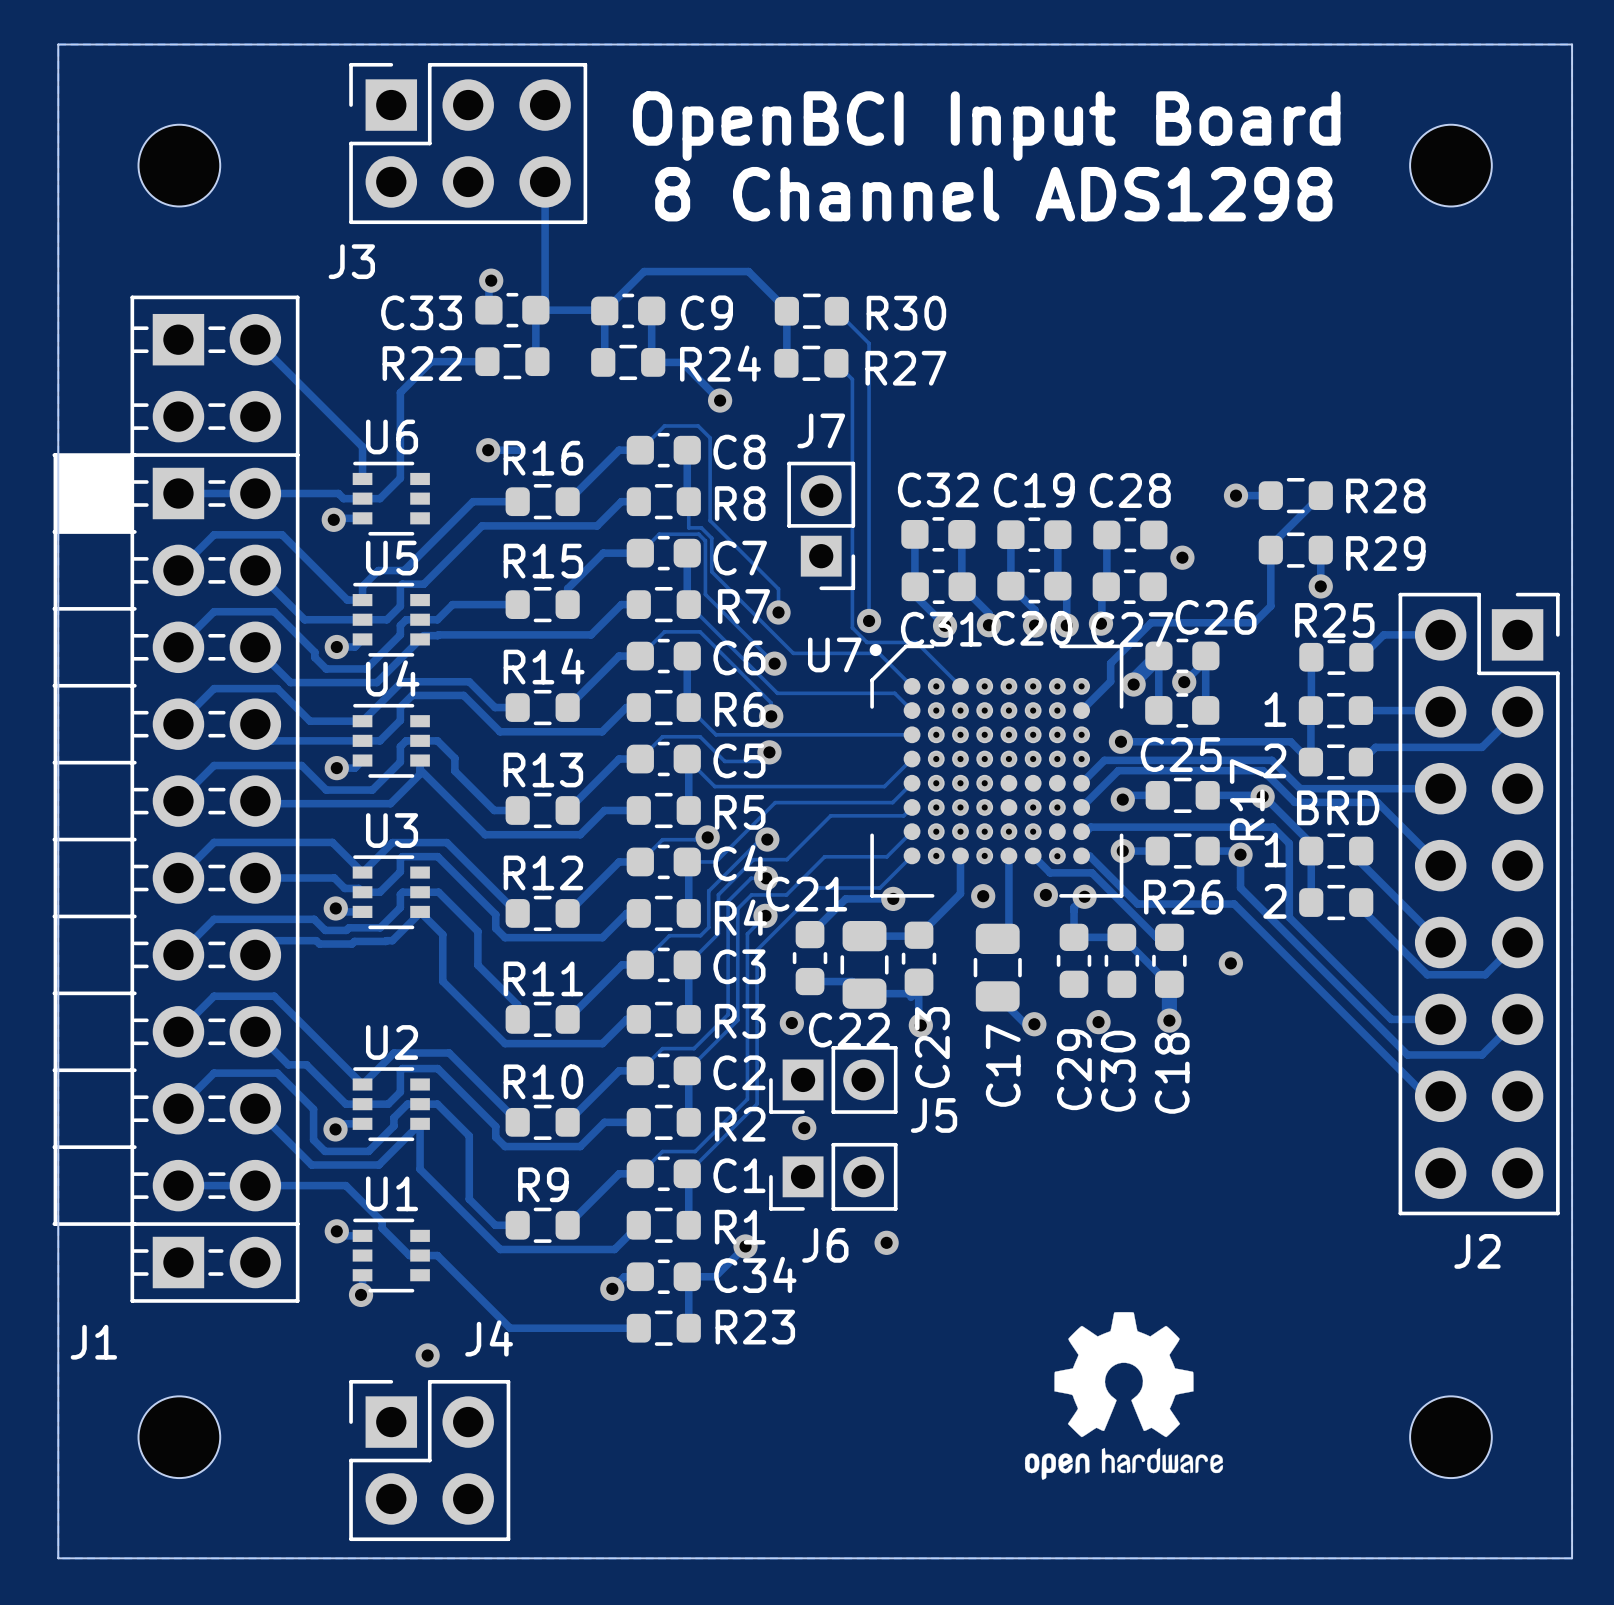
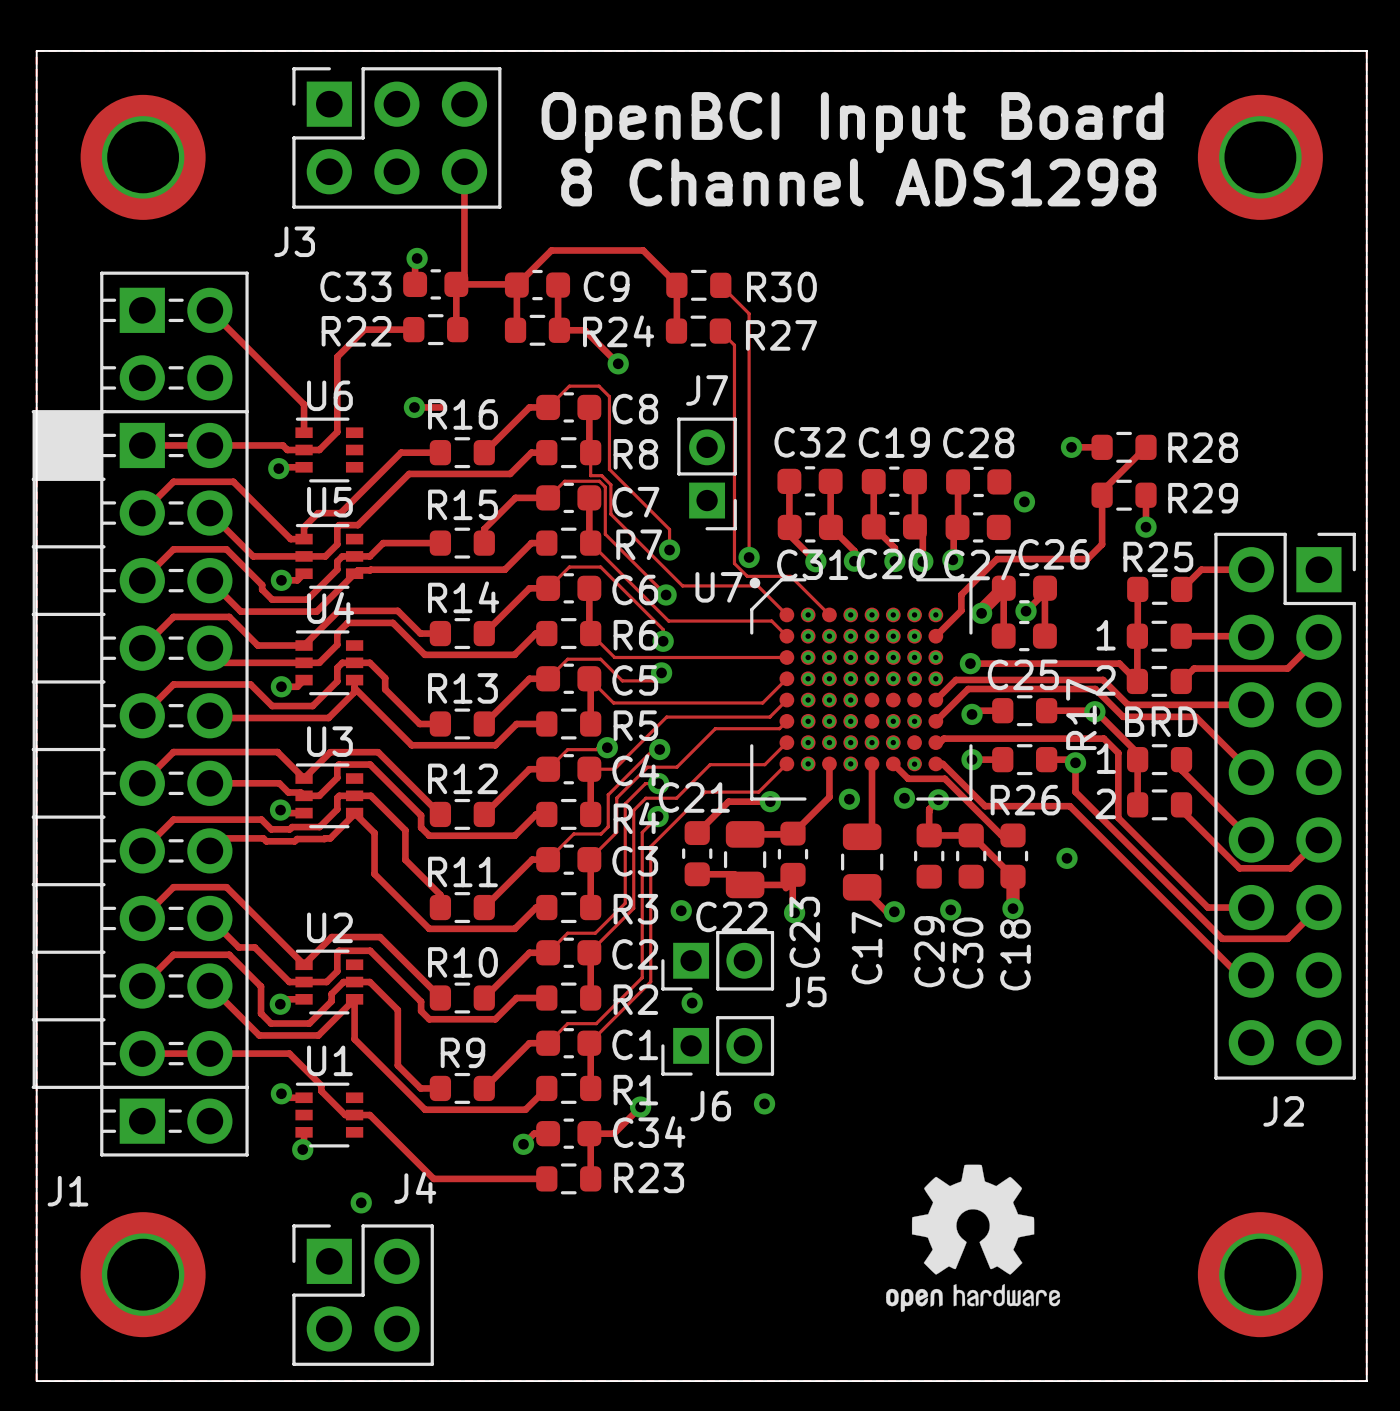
part footprint: [138, 124, 221, 207] -> [80, 94, 206, 220]
part footprint: [1410, 124, 1492, 207] -> [1197, 94, 1323, 220]
part footprint: [138, 1396, 221, 1479] -> [80, 1212, 206, 1338]
part footprint: [1410, 1396, 1492, 1479] -> [1197, 1212, 1323, 1338]

